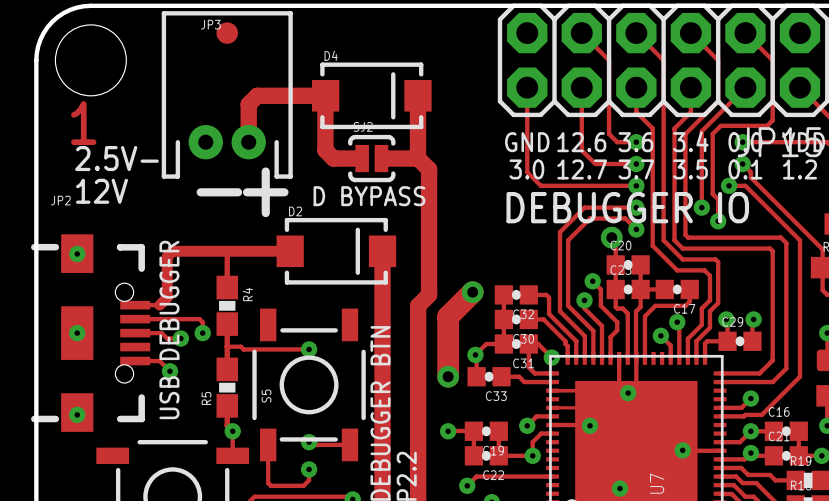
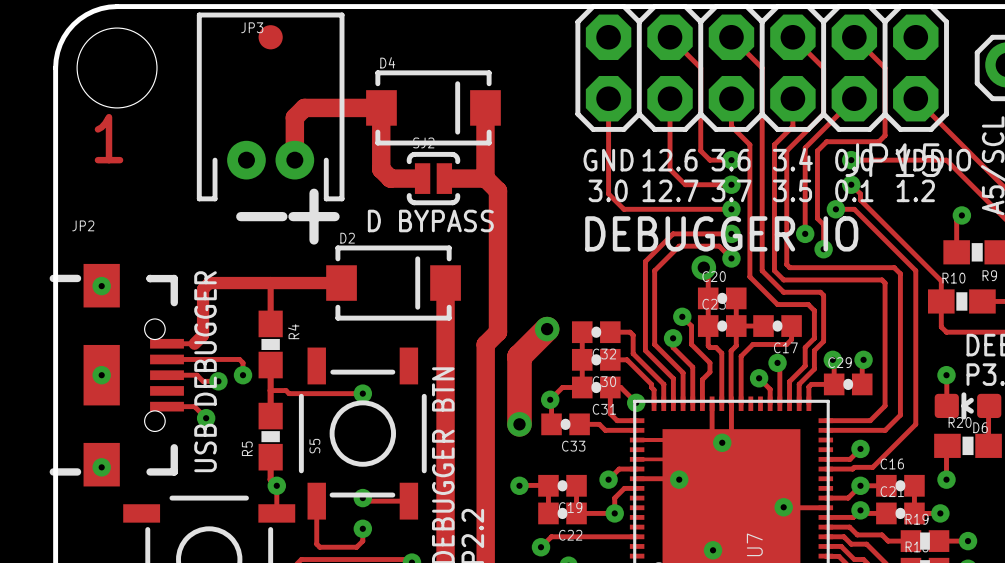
text: 2.5V- (116, 158) -> none
text: 12V (102, 191) -> none

